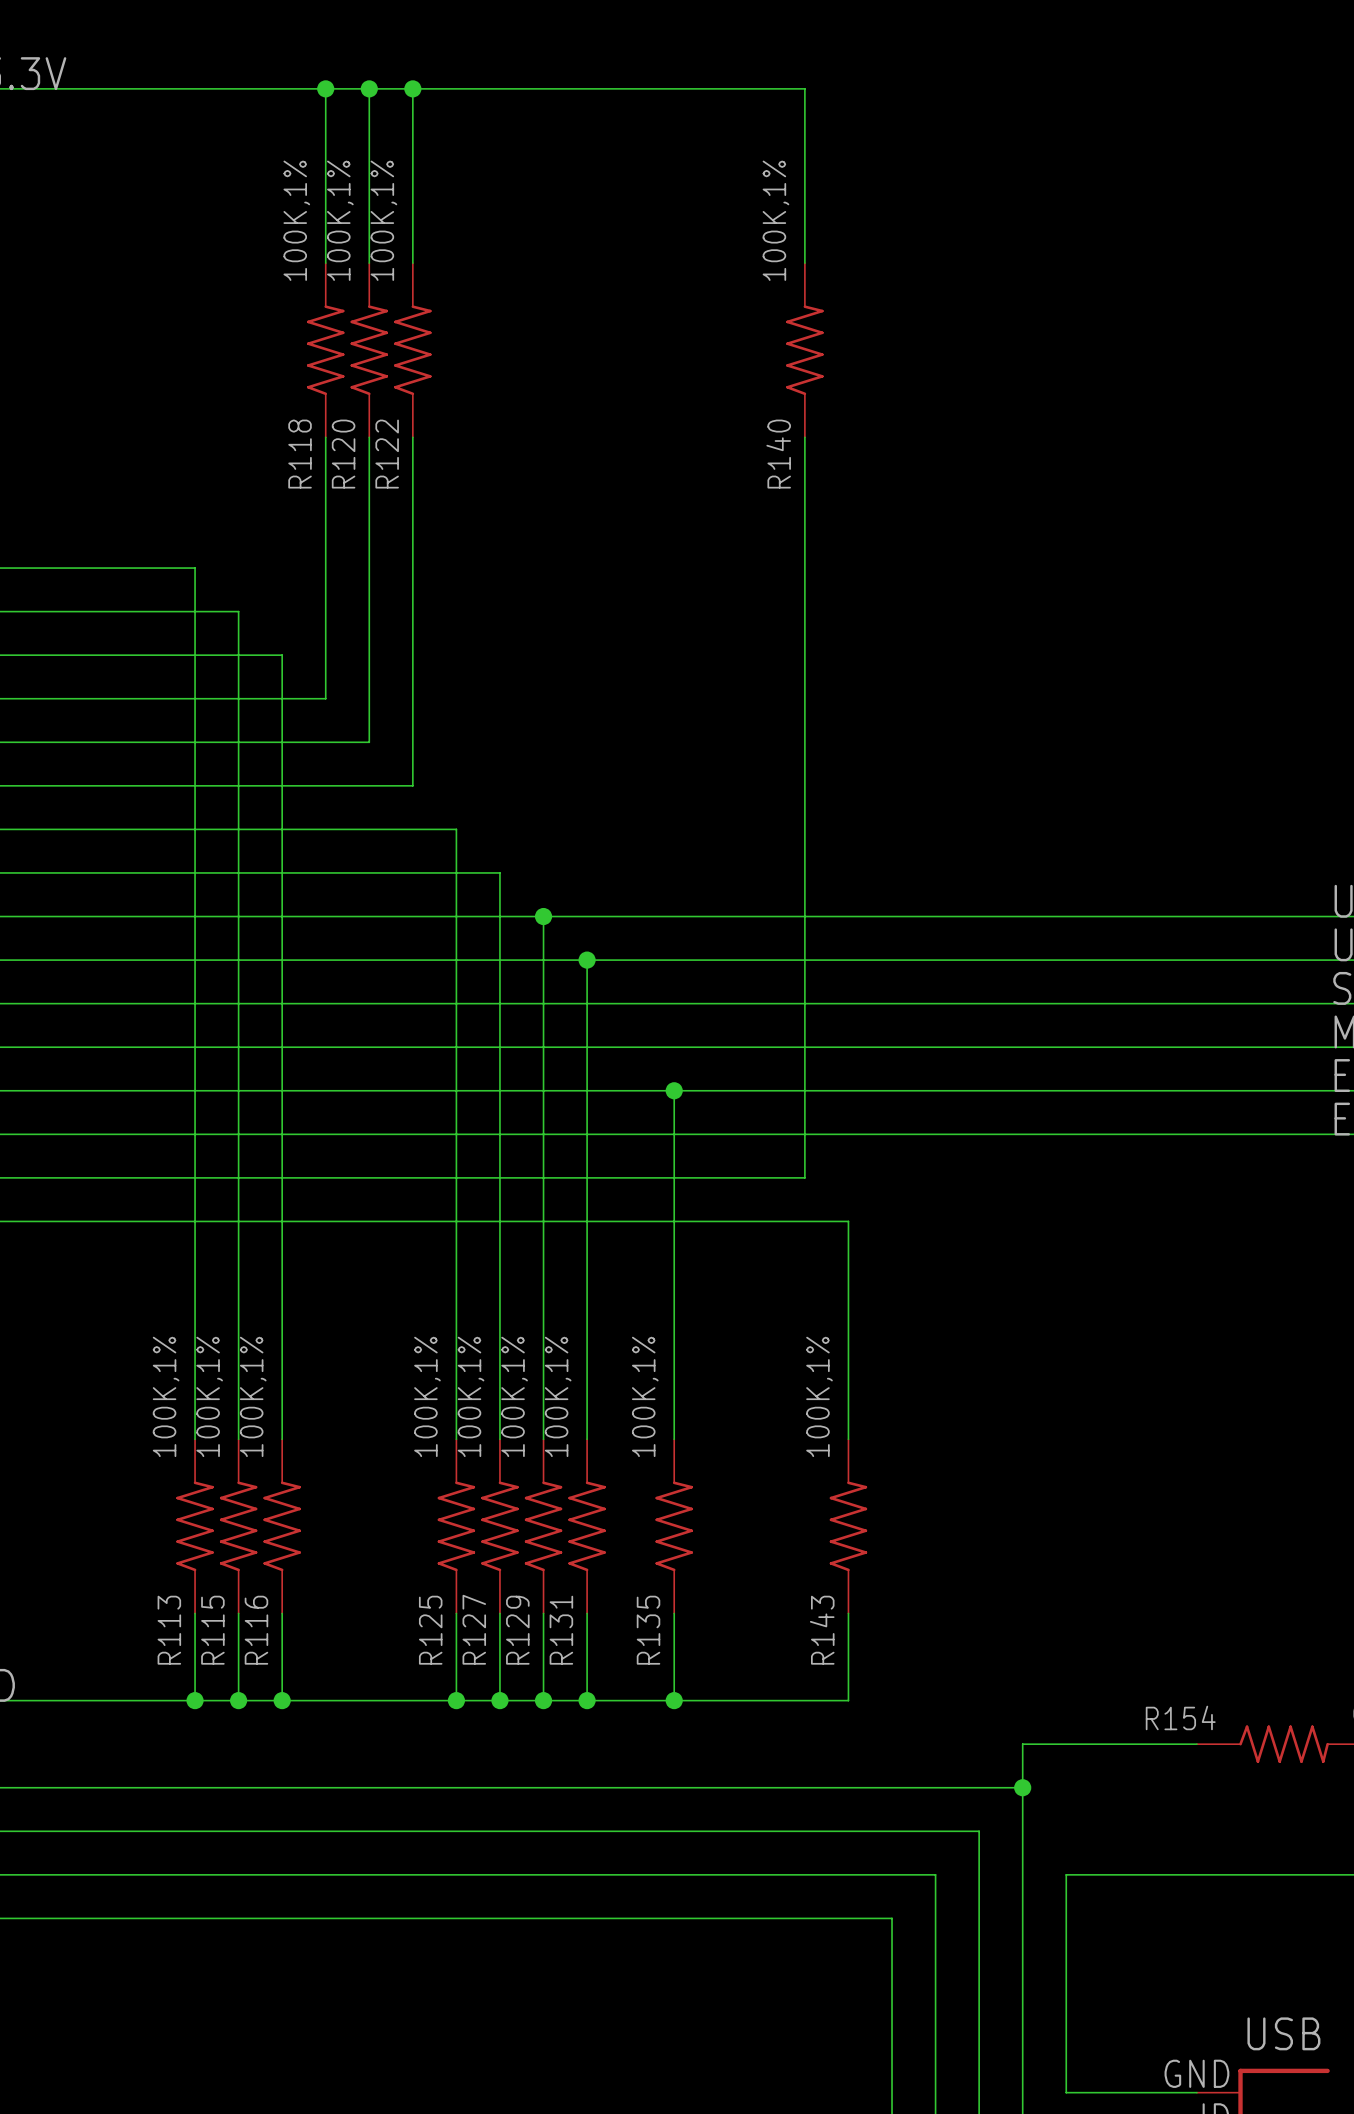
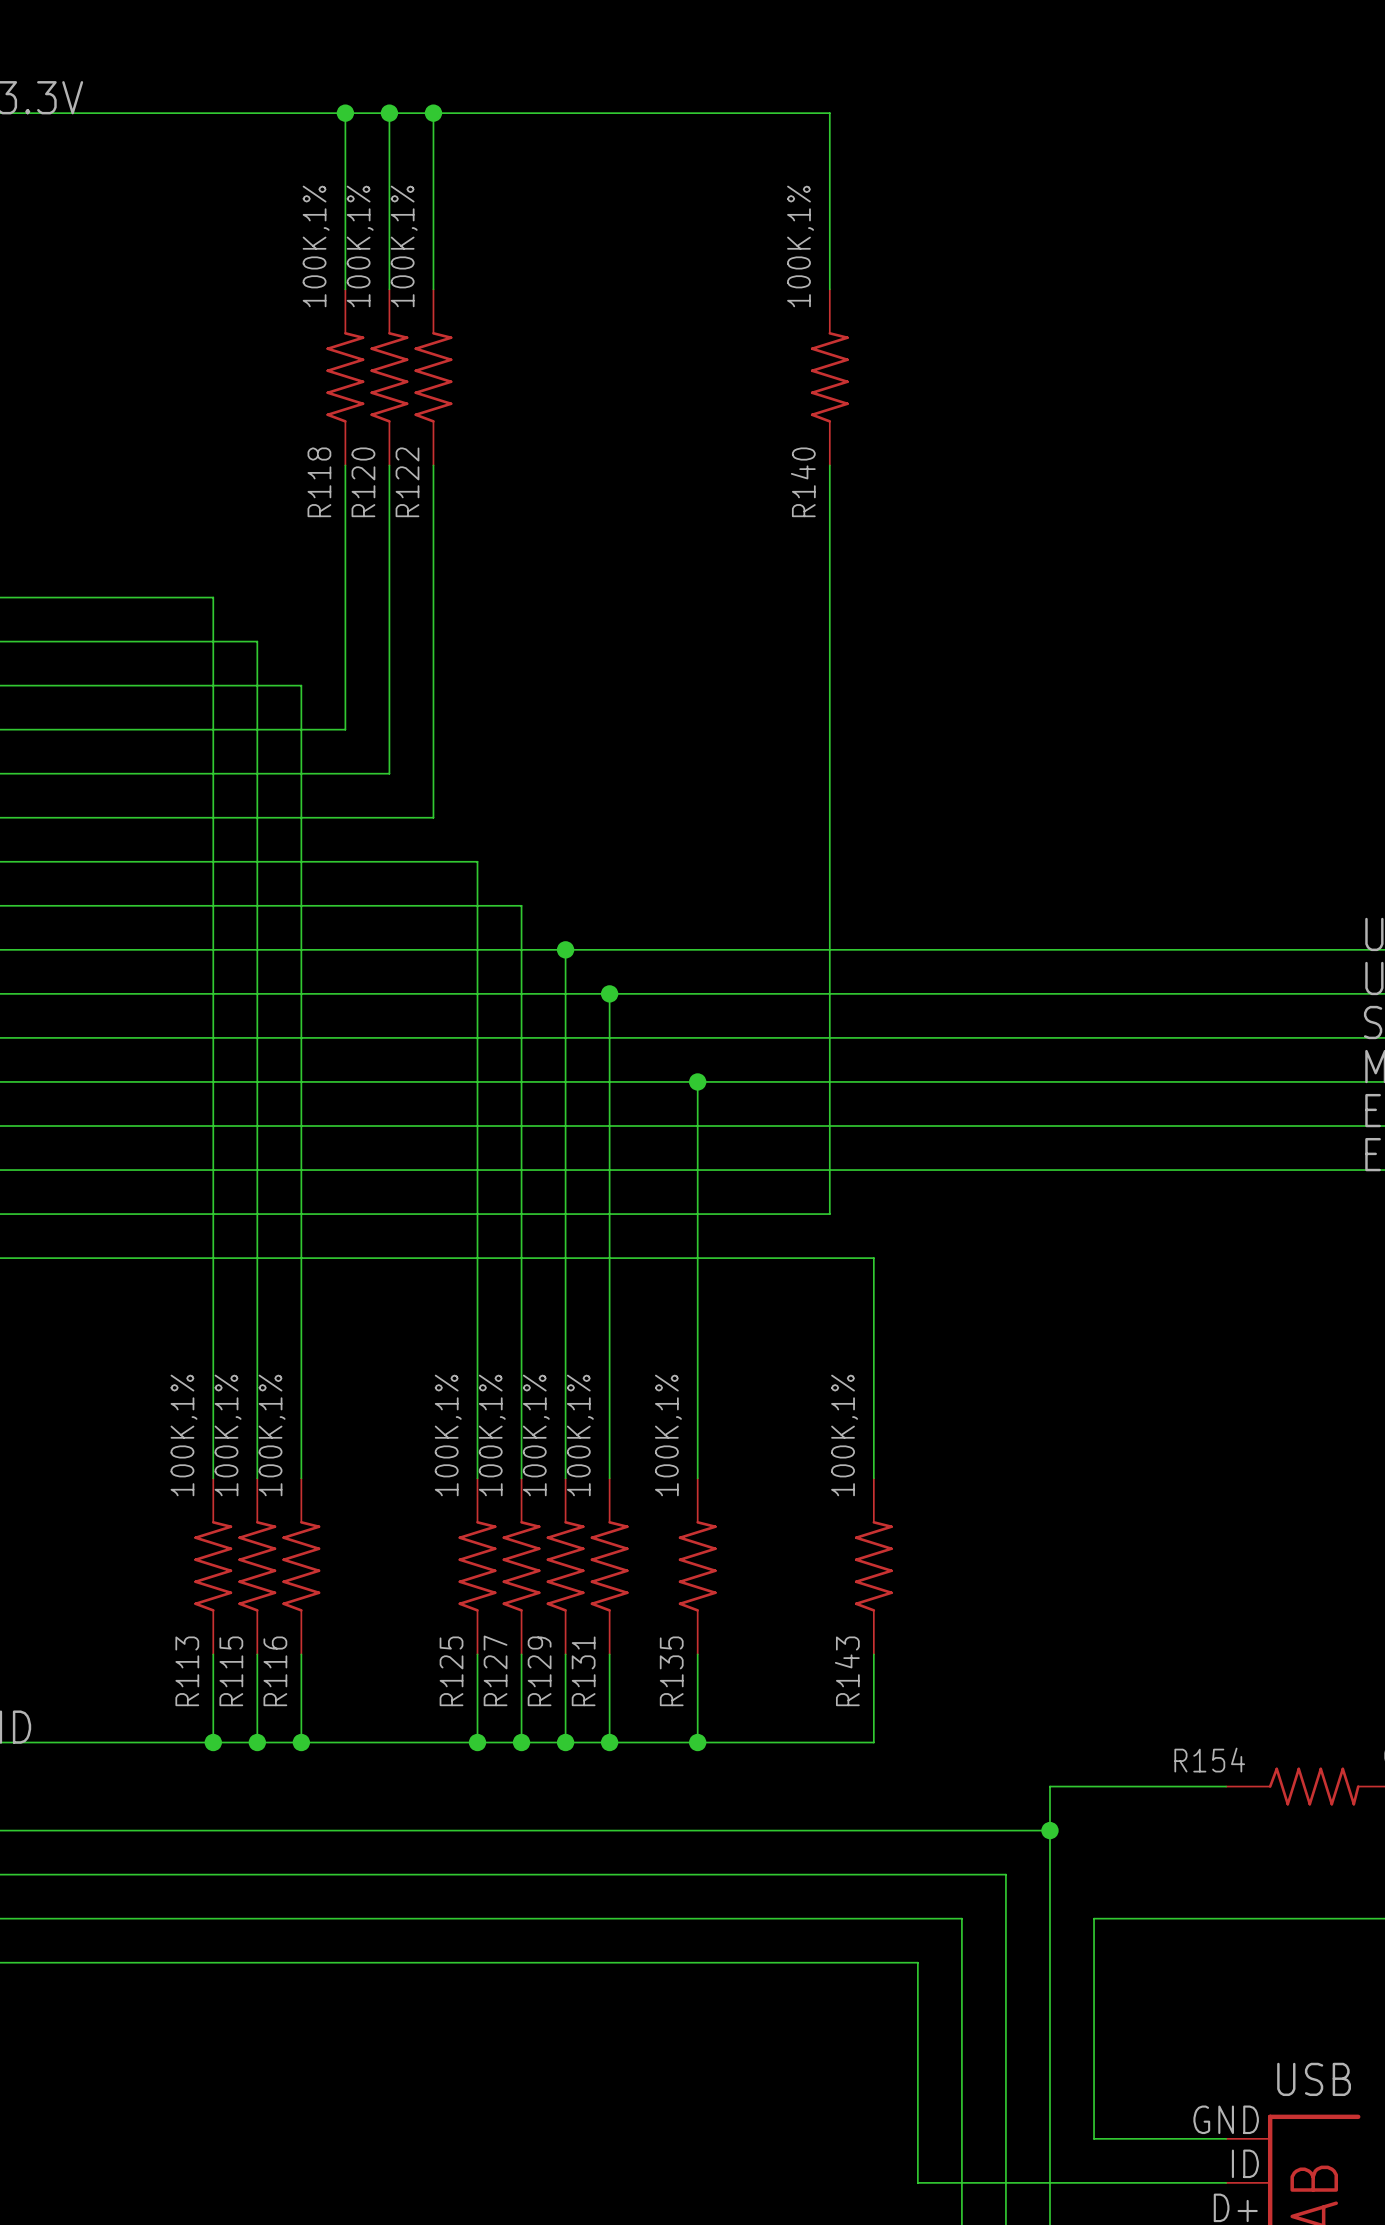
wire: none -> (697, 1081) (697, 1125)
junction position: (674, 1090) -> (697, 1081)

